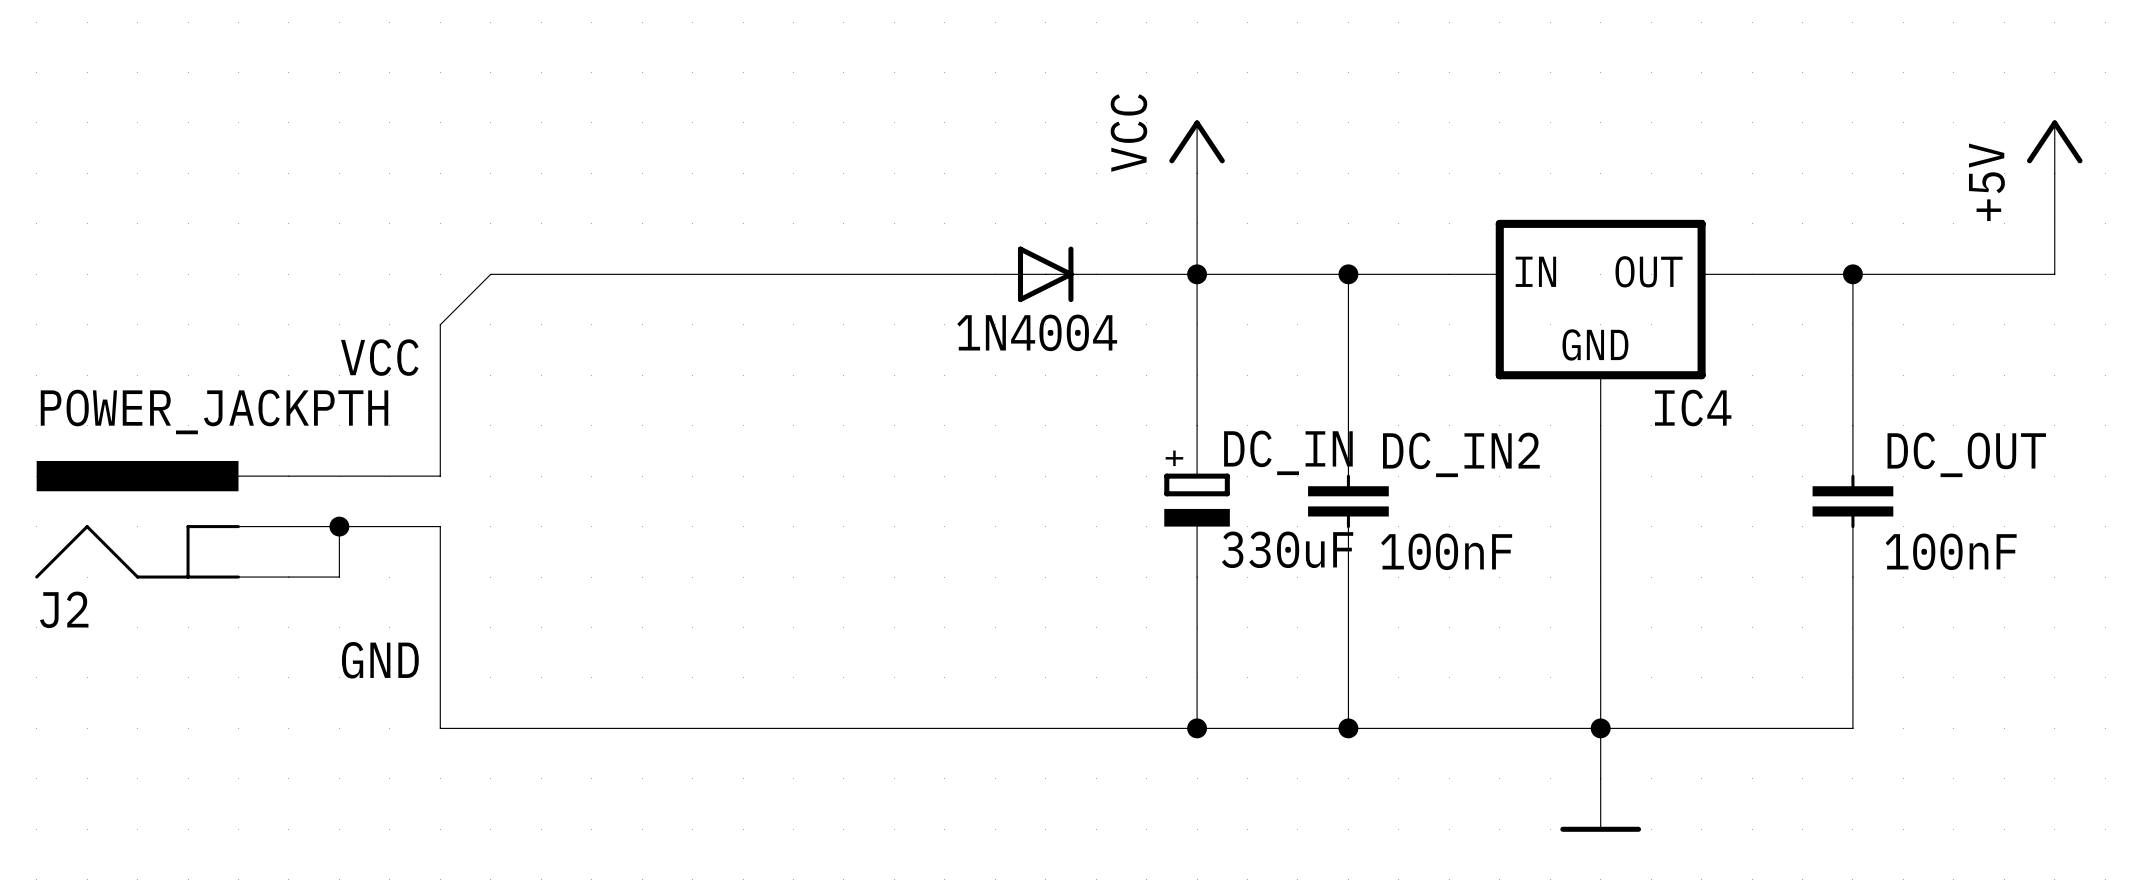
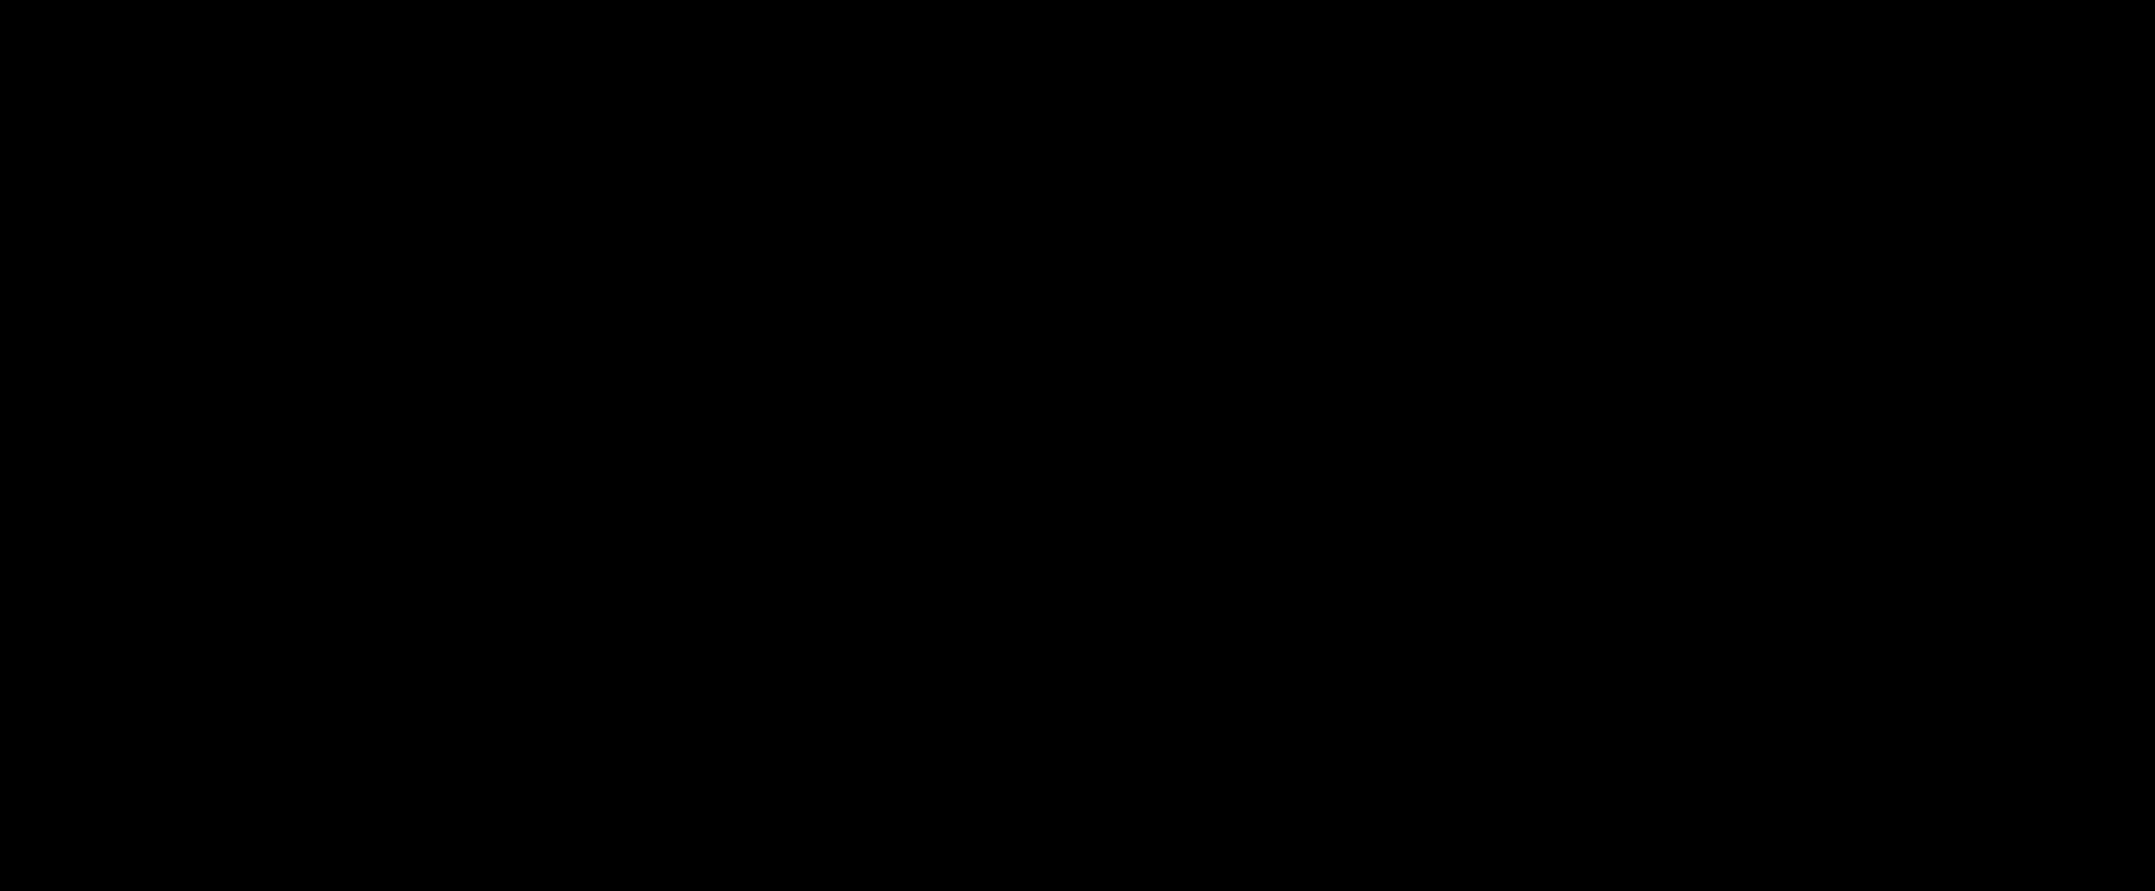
power symbol: VCC (1197, 146) -> none
power symbol: +5V (2054, 146) -> none
wire: (1197, 173) (1197, 425) -> none
wire: (2054, 173) (2054, 274) (1752, 274) -> none
wire: (995, 274) (490, 274) (440, 324) (440, 476) (288, 476) -> none
part: 1N4004 (1045, 274) -> none
wire: (1096, 274) (1449, 274) -> none
junction: (1197, 274) -> none
wire: (1348, 274) (1348, 425) -> none
junction: (1348, 274) -> none
wire: (1852, 274) (1852, 425) -> none
junction: (1852, 274) -> none
IC4: (1600, 322) -> none
text: VCC (379, 357) -> none
wire: (1600, 425) (1600, 778) -> none
DC_IN: 330uF (1197, 501) -> none
DC_IN2: 100nF (1348, 501) -> none
DC_OUT: 100nF (1852, 501) -> none
J2: POWER_JACKPTH (162, 519) -> none
wire: (288, 526) (440, 526) (440, 728) (1852, 728) (1852, 577) -> none
wire: (339, 526) (339, 577) (288, 577) -> none
junction: (339, 526) -> none
wire: (1197, 577) (1197, 728) -> none
wire: (1348, 577) (1348, 728) -> none
text: GND (380, 660) -> none
junction: (1197, 728) -> none
junction: (1348, 728) -> none
junction: (1600, 728) -> none
power symbol: (1600, 805) -> none

